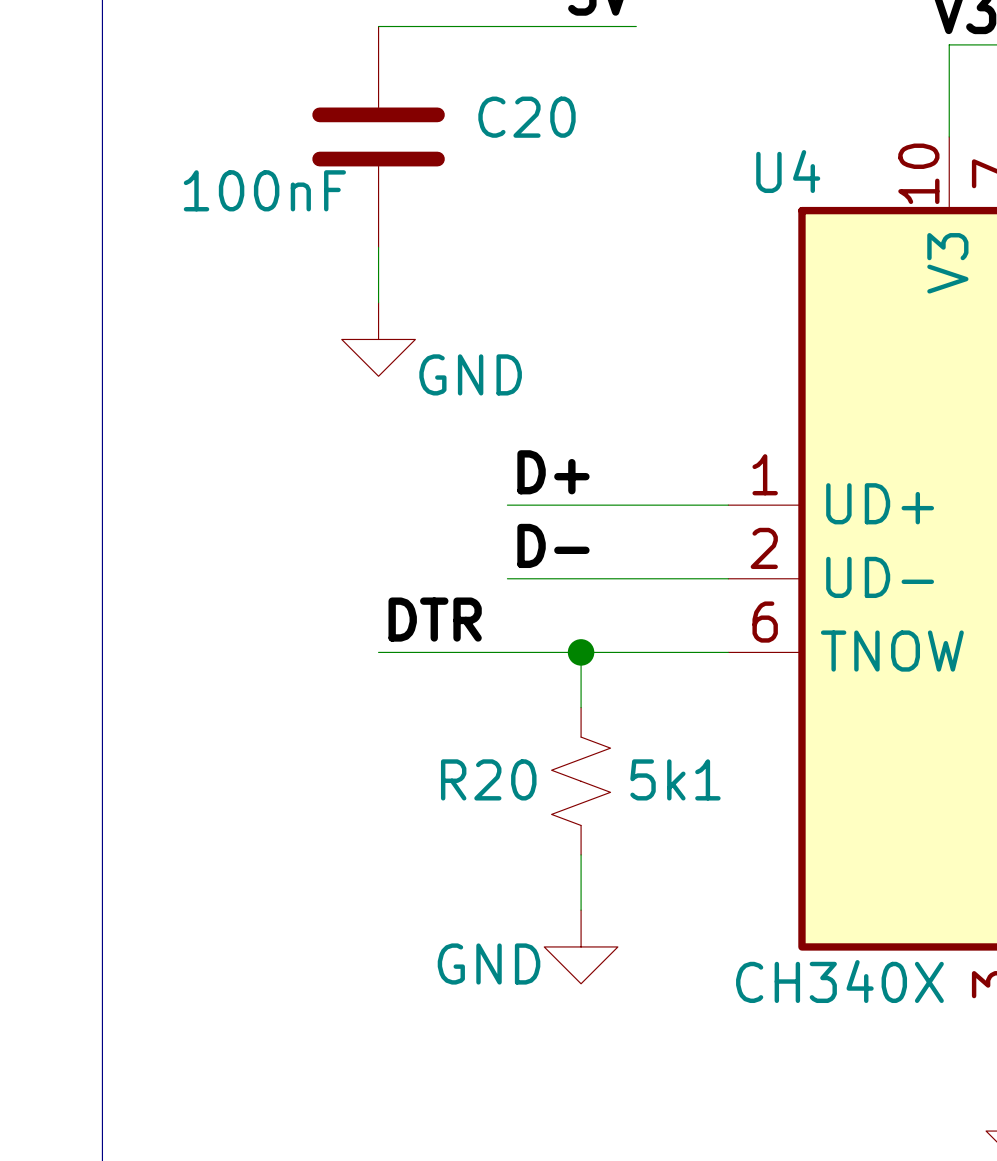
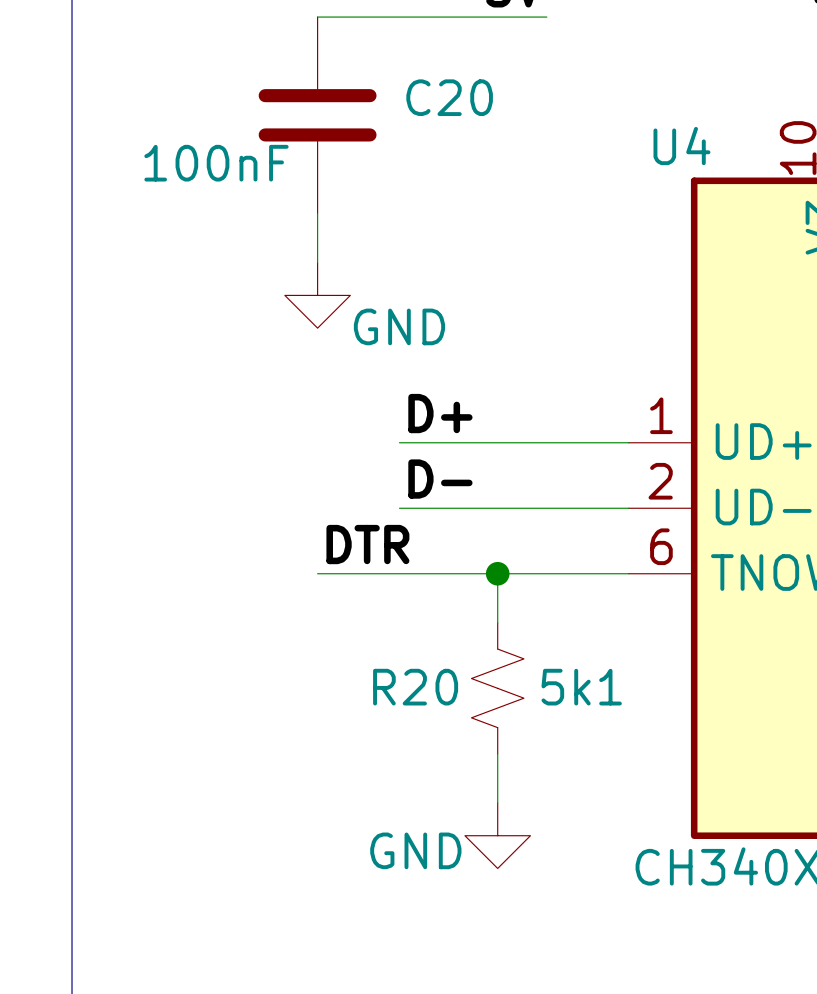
label position: D+ (553, 472) -> D+ (440, 413)
wire: none -> (399, 442) (432, 442)
label position: D- (553, 545) -> D- (440, 479)
wire: none -> (399, 508) (432, 508)

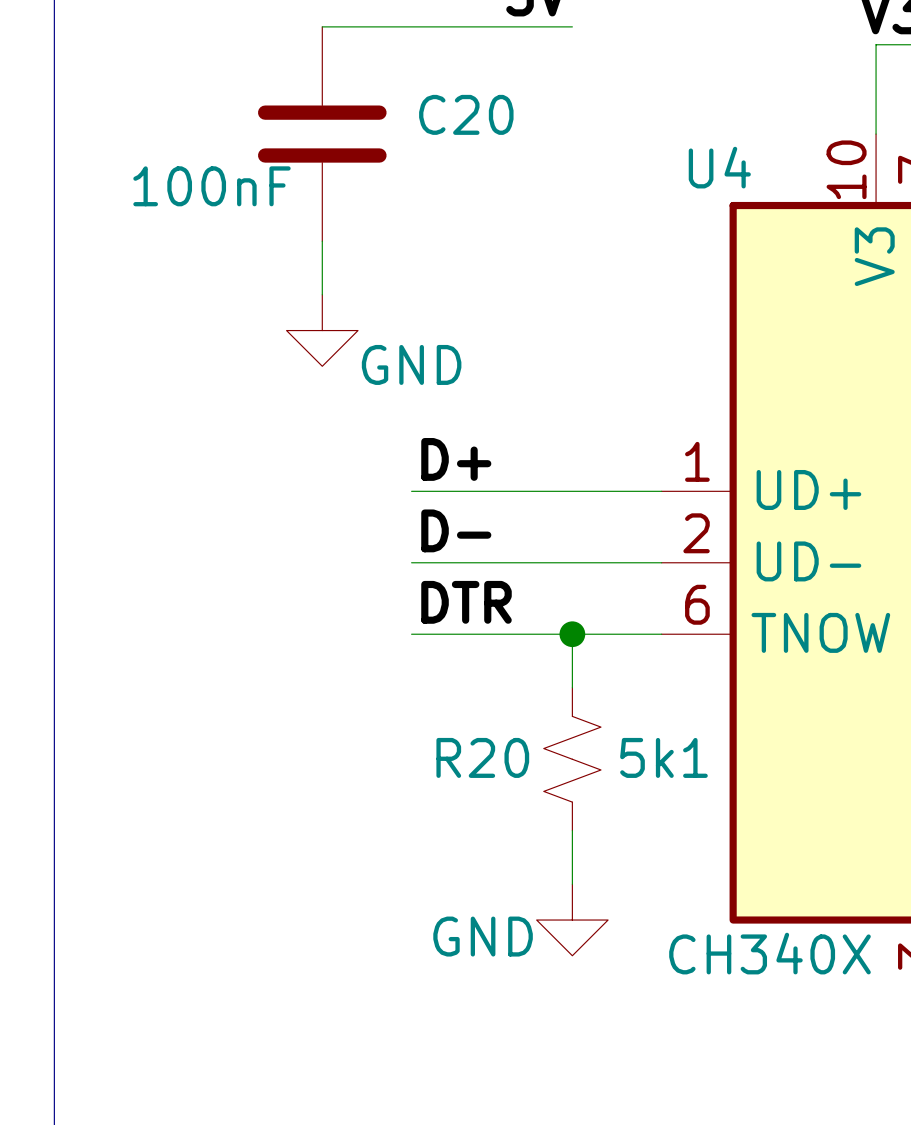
label position: DTR (367, 544) -> DTR (466, 602)
wire: (317, 573) (399, 573) -> none
wire: (497, 573) (497, 622) -> (572, 634) (572, 687)
junction position: (497, 573) -> (572, 634)
R20 position: (497, 688) -> (572, 759)
wire: (497, 753) (497, 802) -> (572, 830) (572, 884)
power symbol position: GND (497, 835) -> GND (572, 920)

